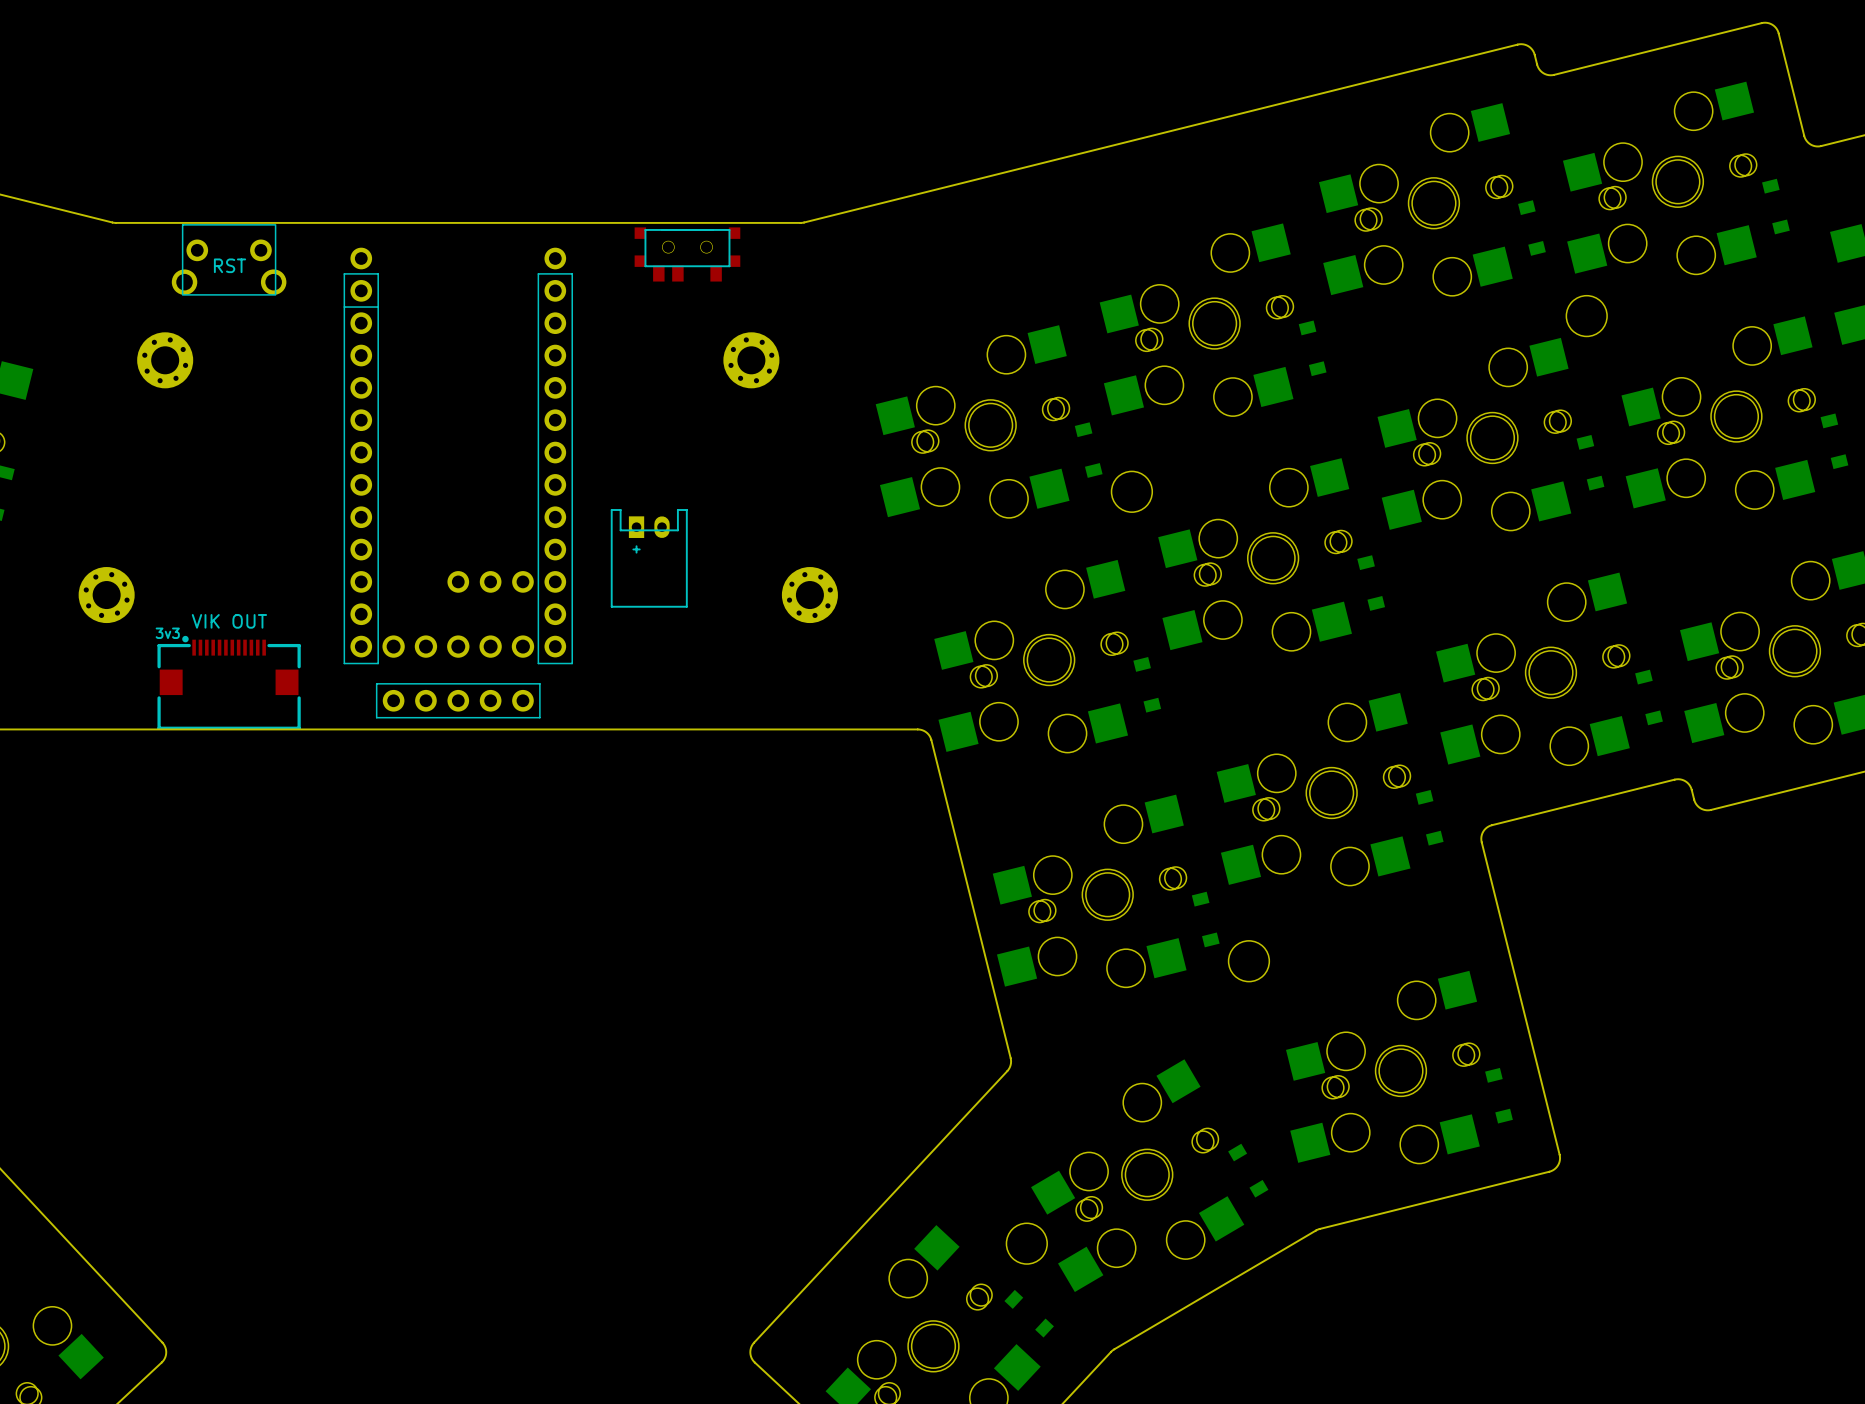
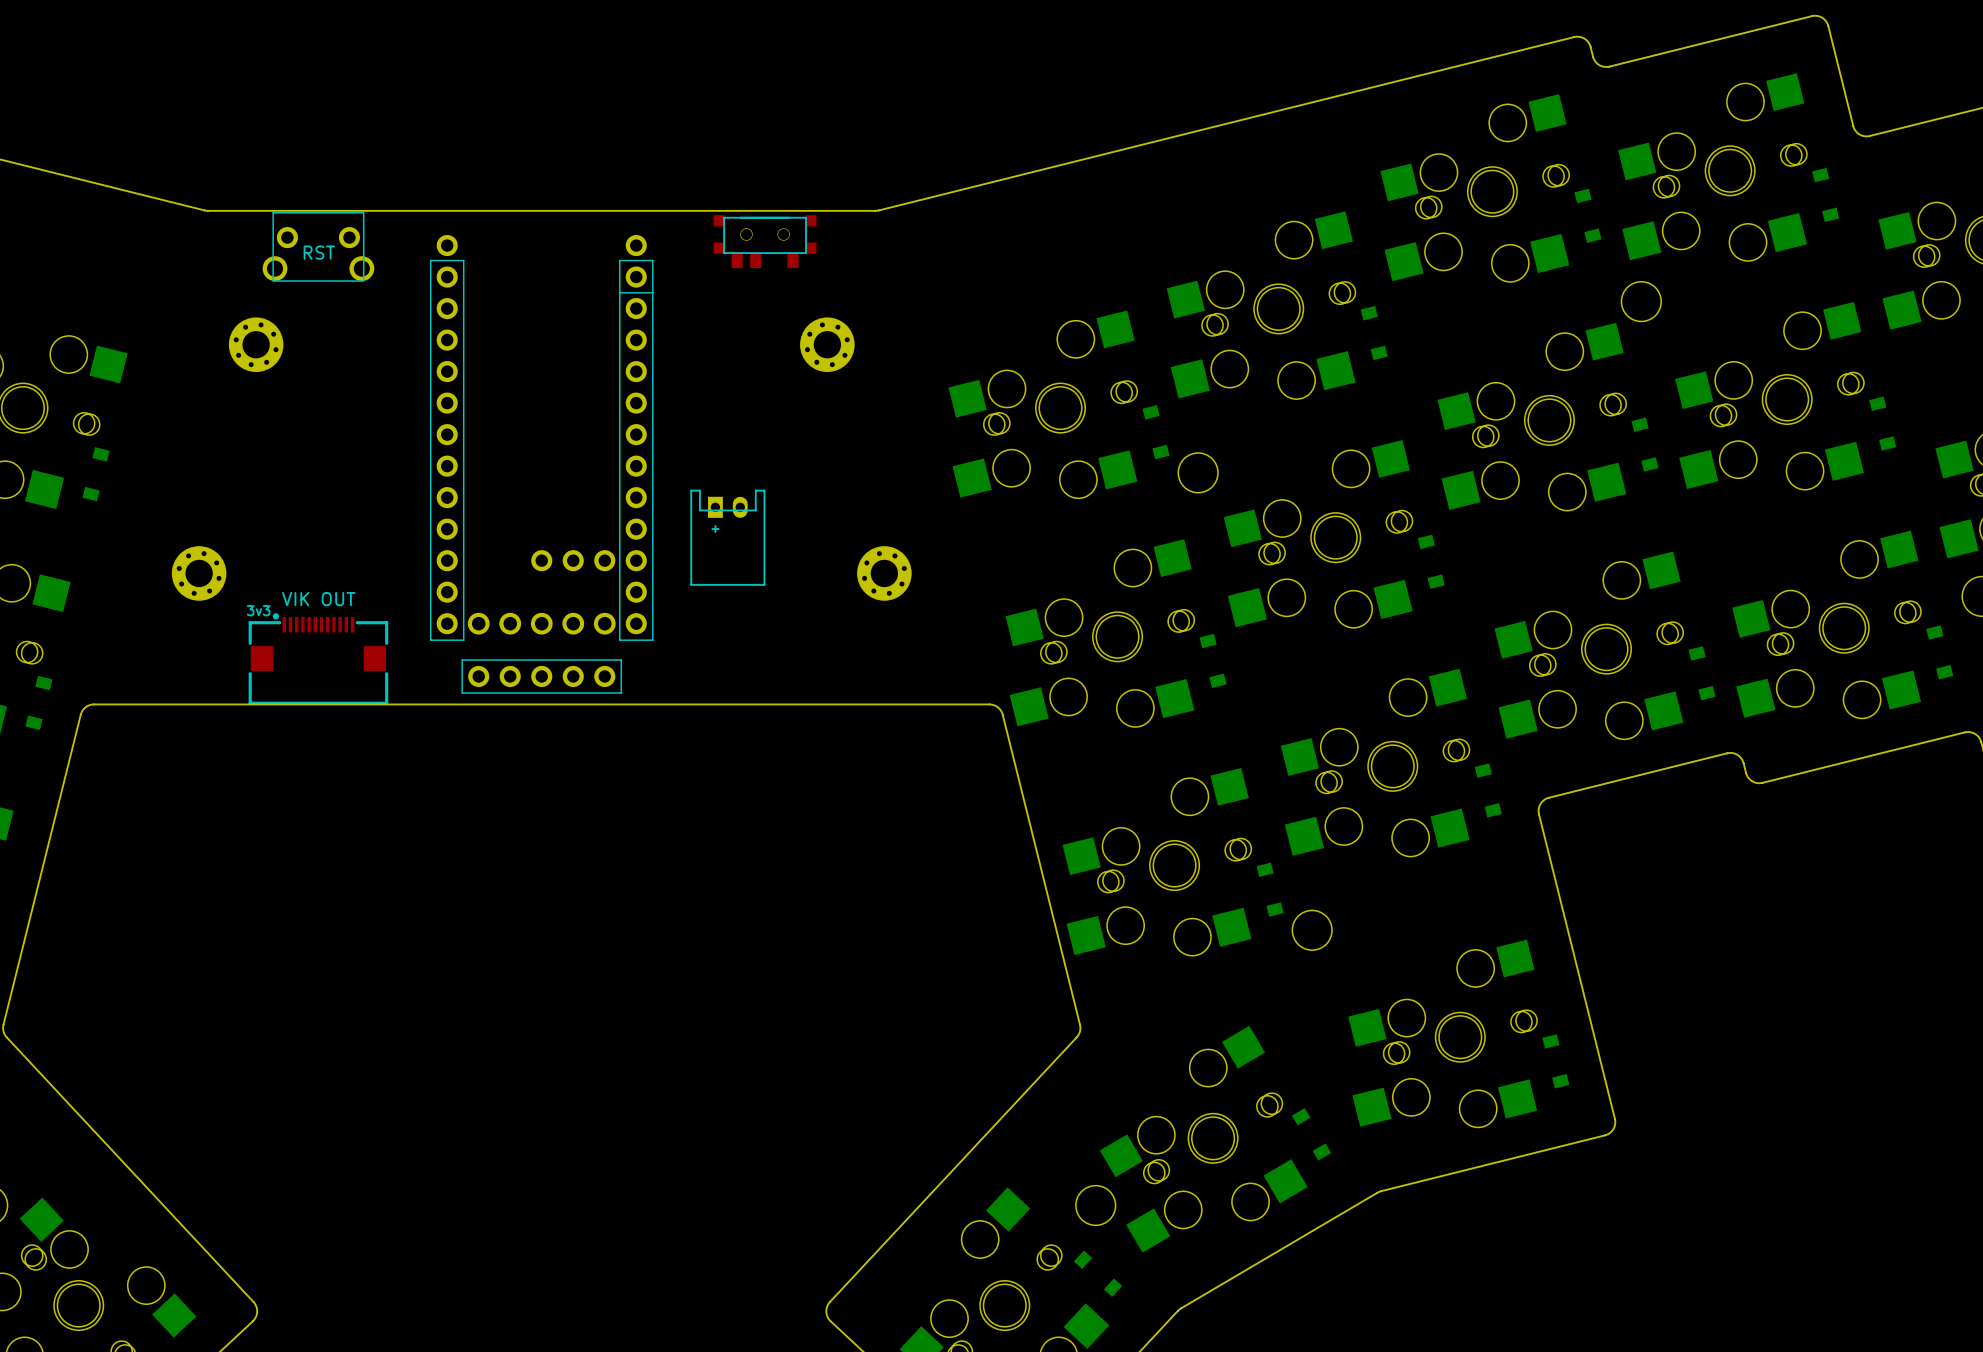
part footprint: [343, 247, 574, 665] -> [429, 234, 654, 641]

